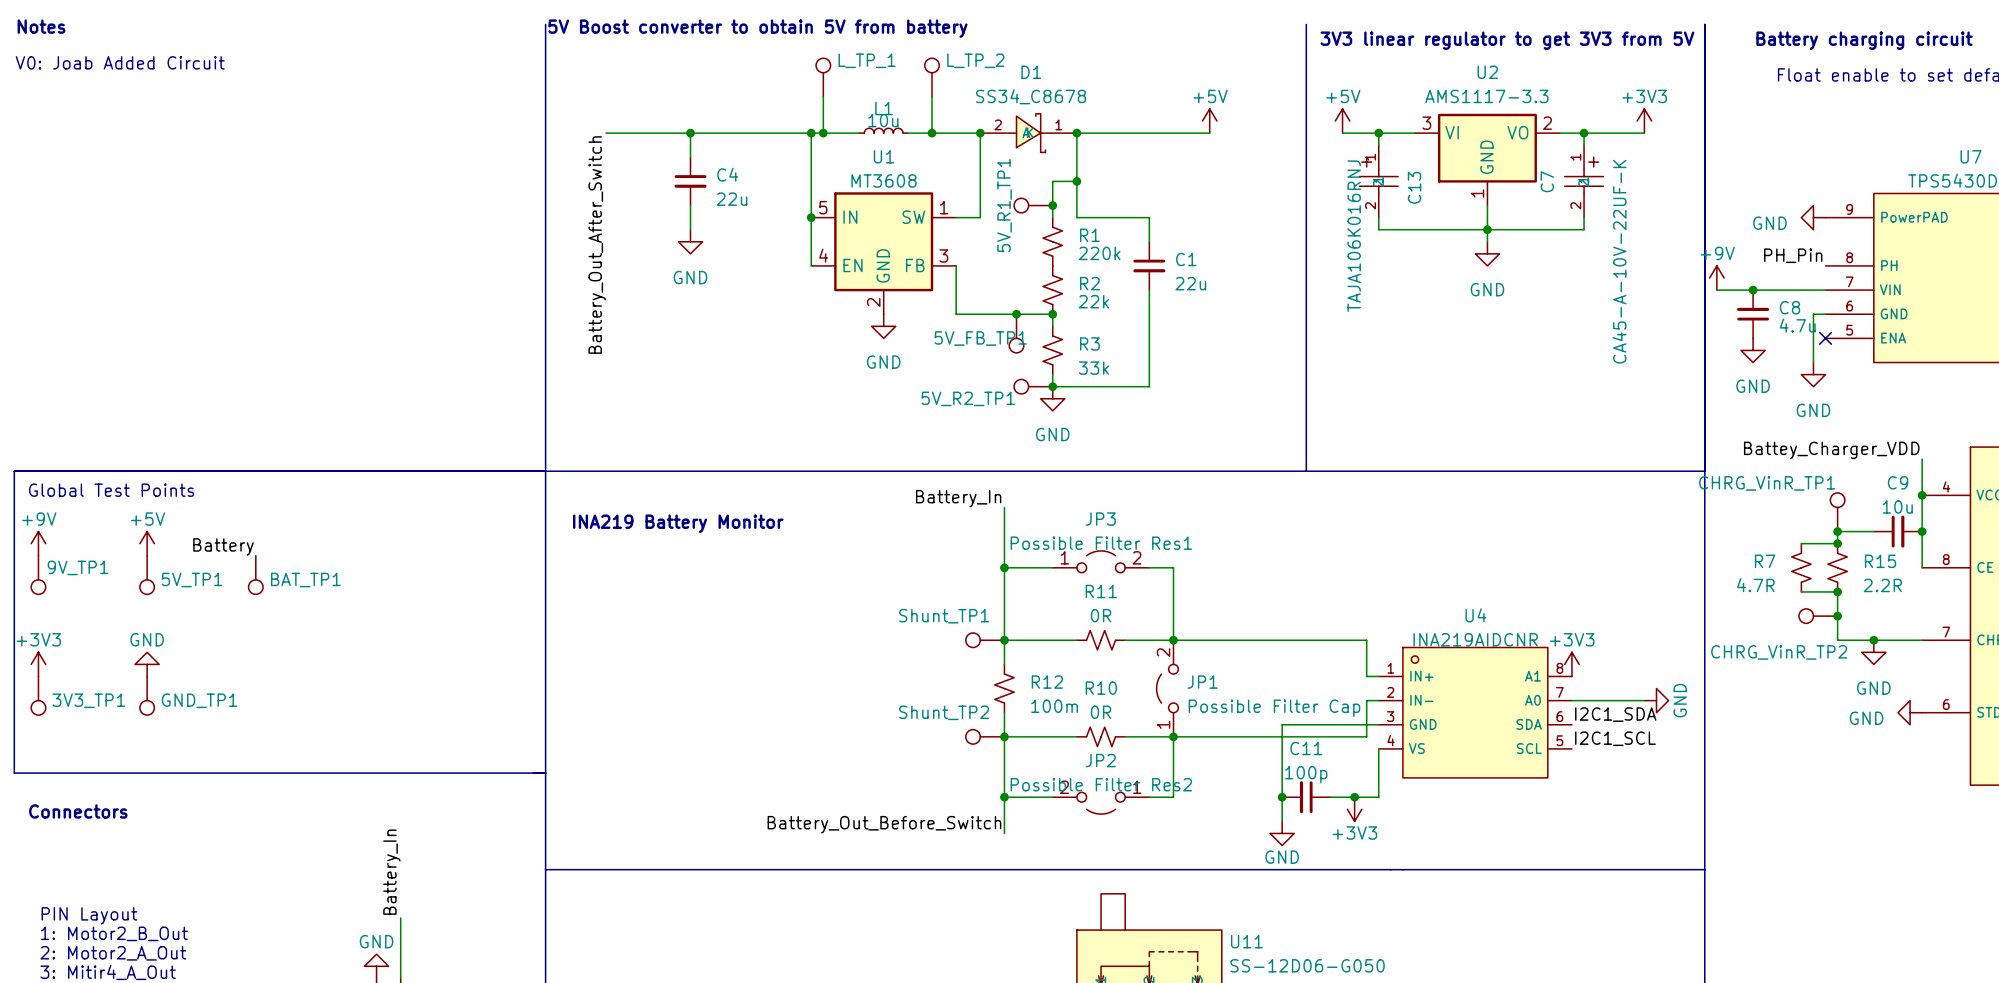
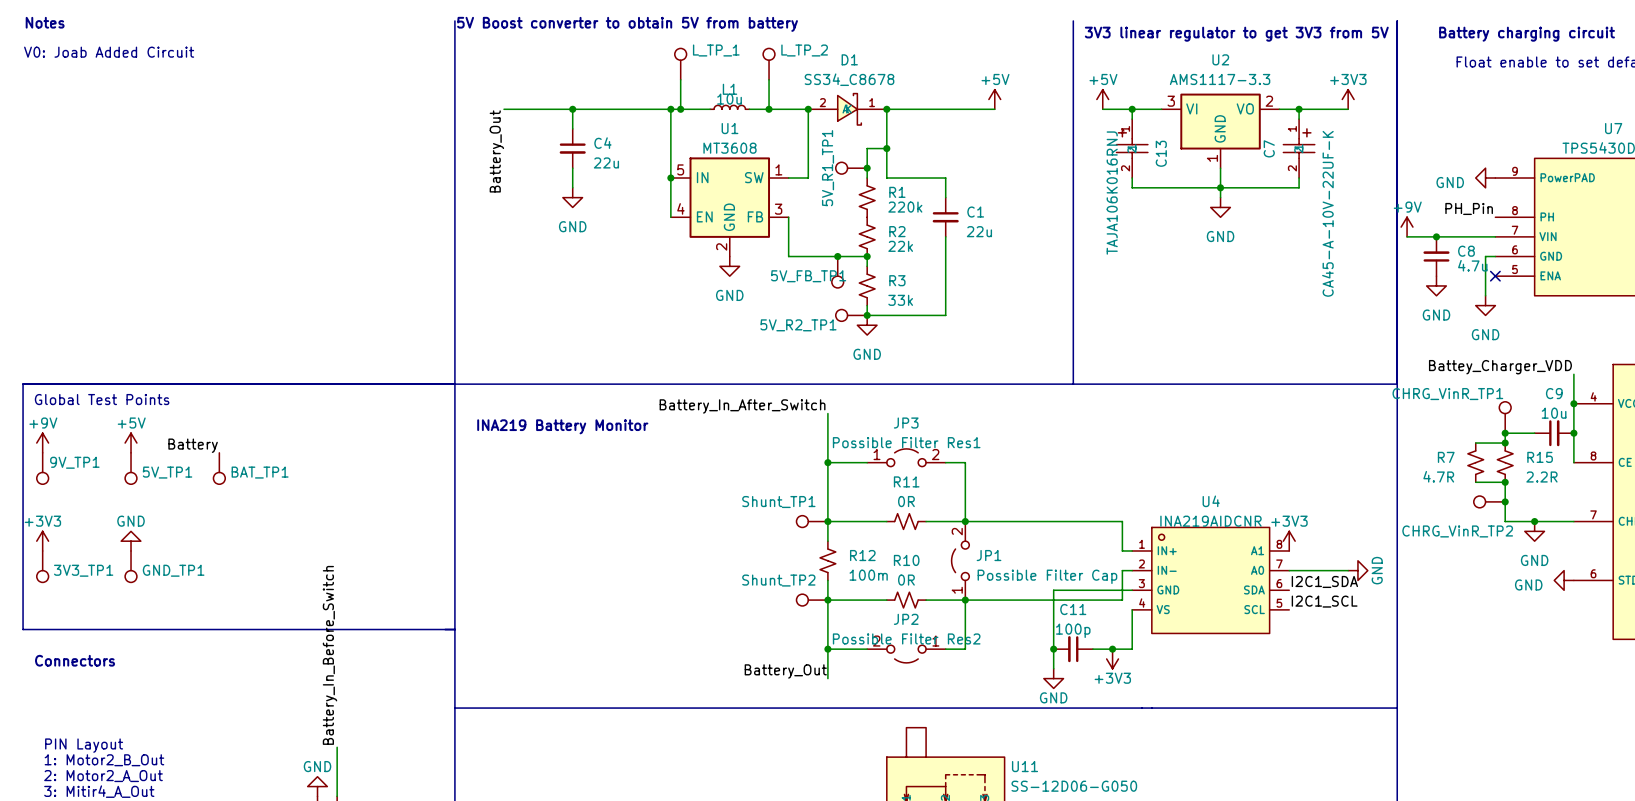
label: Battery_Out_After_Switch (597, 245) -> Battery_Out (496, 151)
label: Battery_In (958, 498) -> Battery_In_After_Switch (742, 406)
label: Battery_Out_Before_Switch (884, 824) -> Battery_Out (785, 671)
label: Battery_In (391, 872) -> Battery_In_Before_Switch (330, 655)

